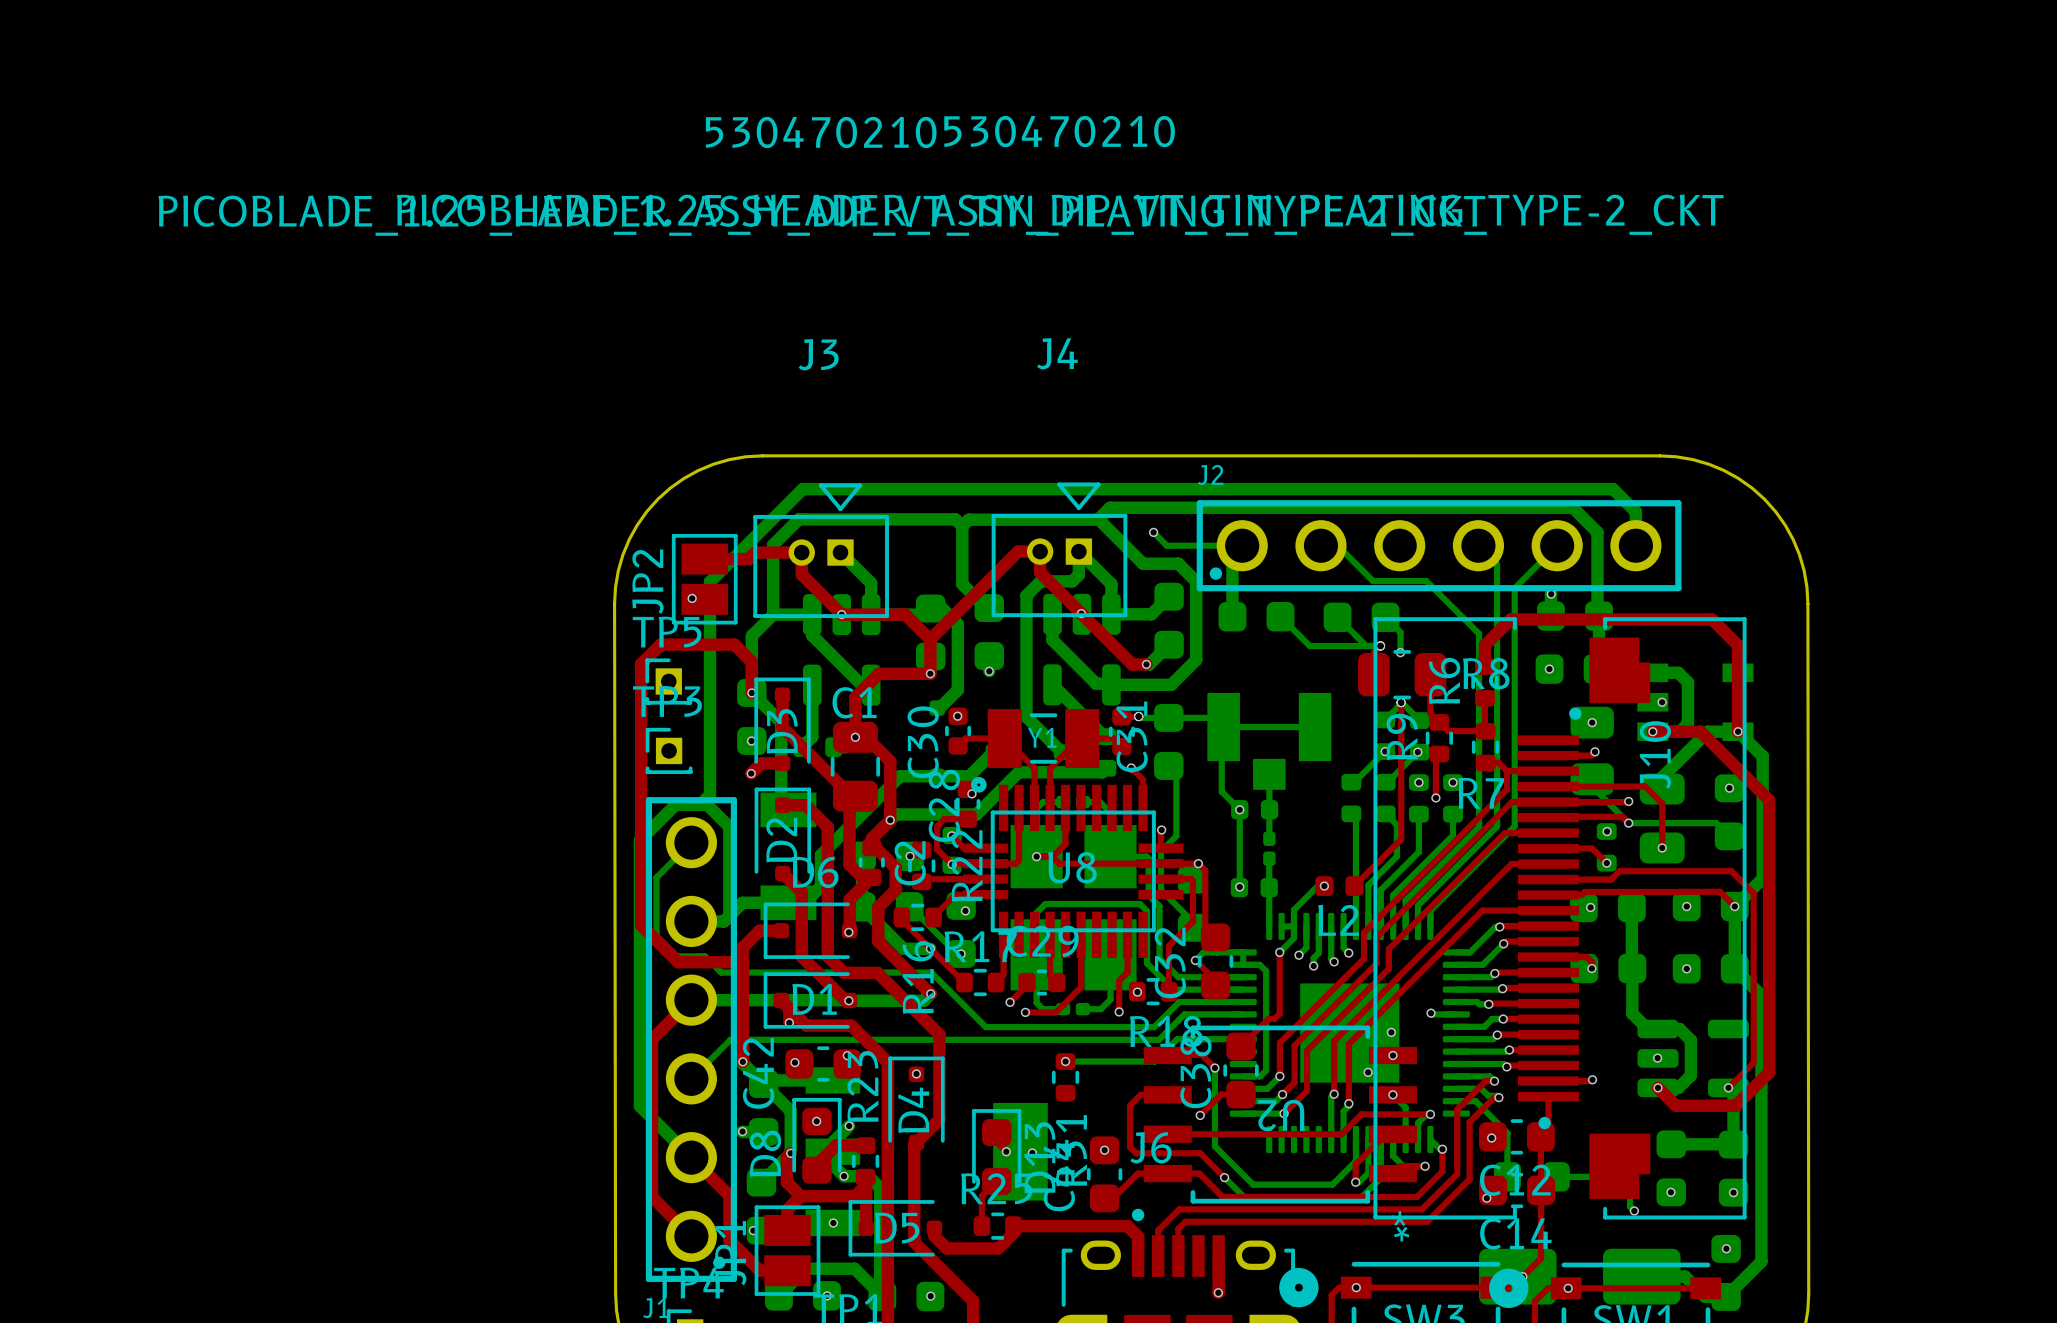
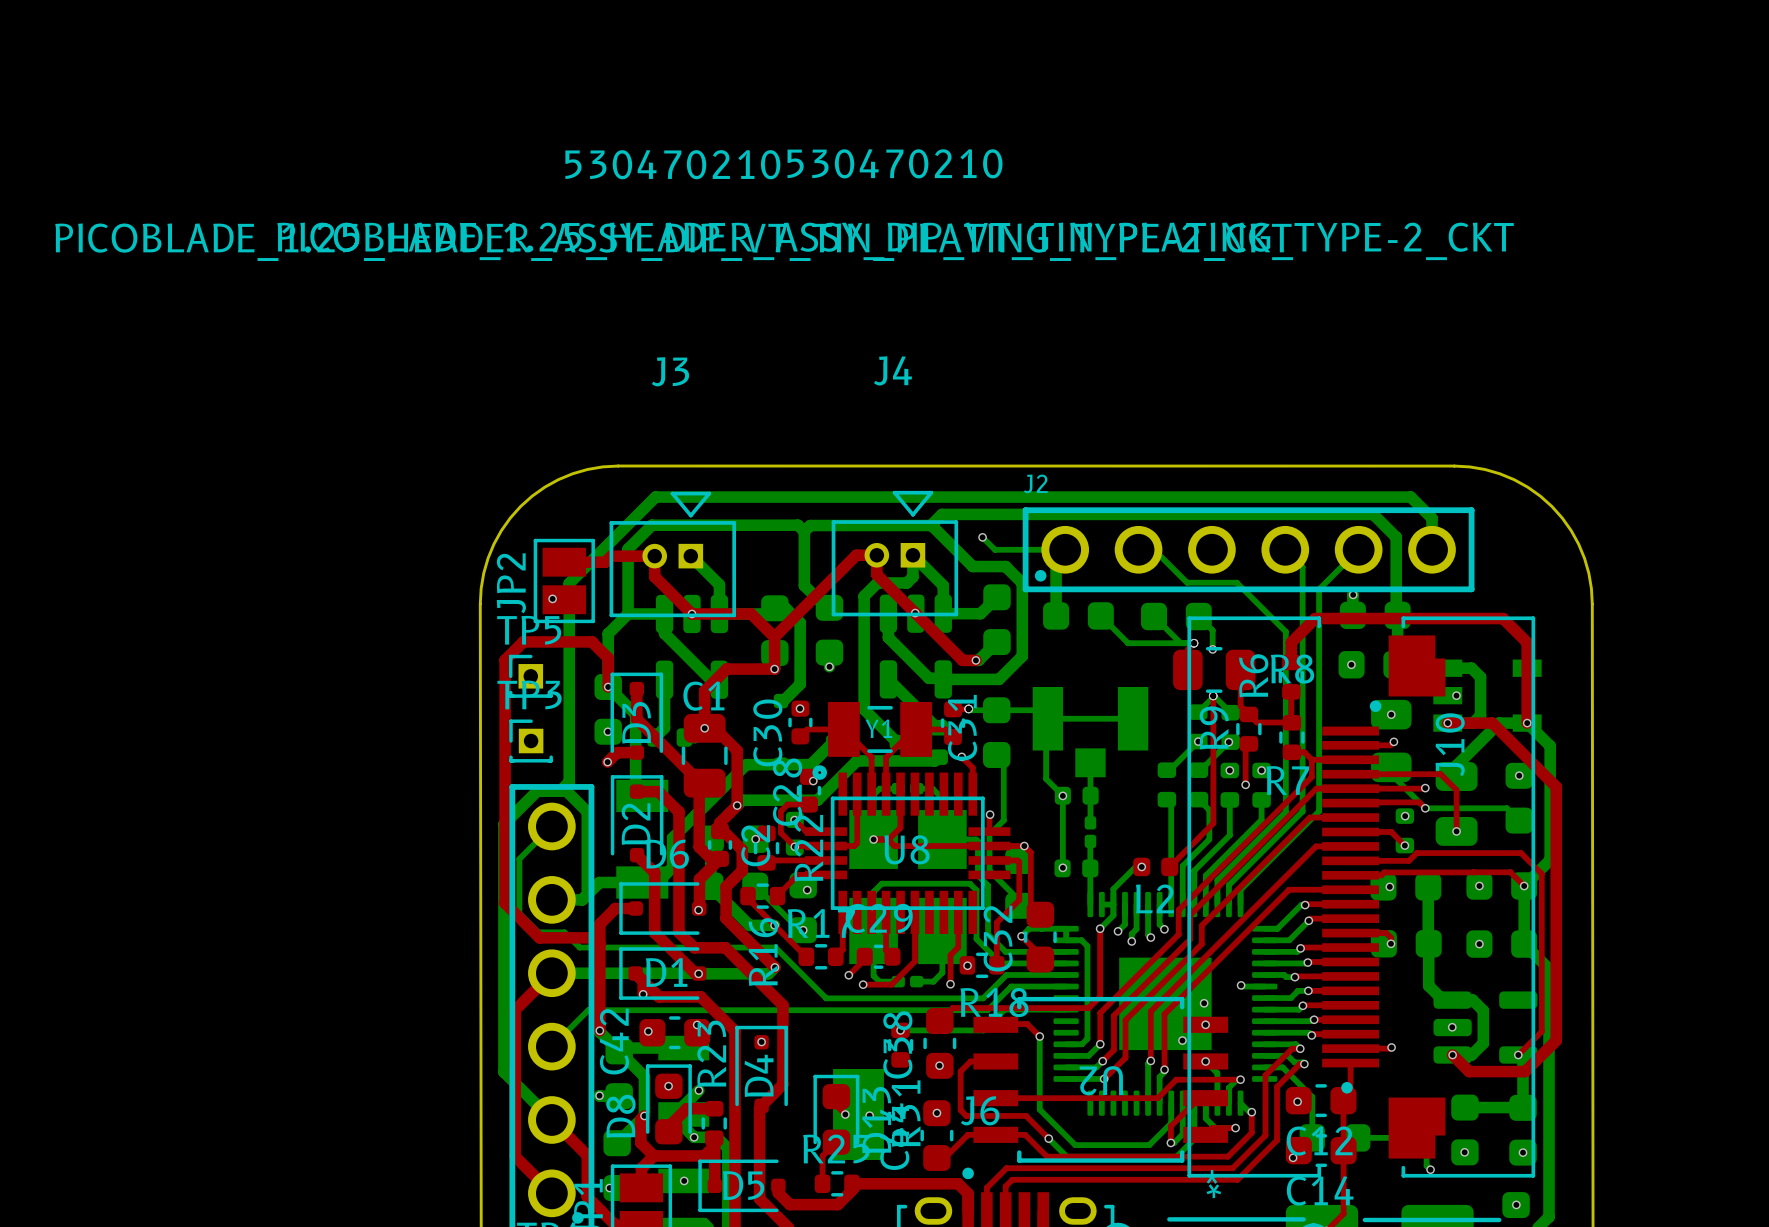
top track: (1279, 1013) (1274, 1018) (1268, 1018) (1241, 1046) -> (1100, 985) (1100, 996) (1088, 1008) (952, 1008) (939, 1021)
C38 position: (1241, 1070) -> (939, 1043)
top track: (1241, 1094) (1221, 1094) (1200, 1115) -> none
via position: (1200, 1115) -> (939, 1065)

